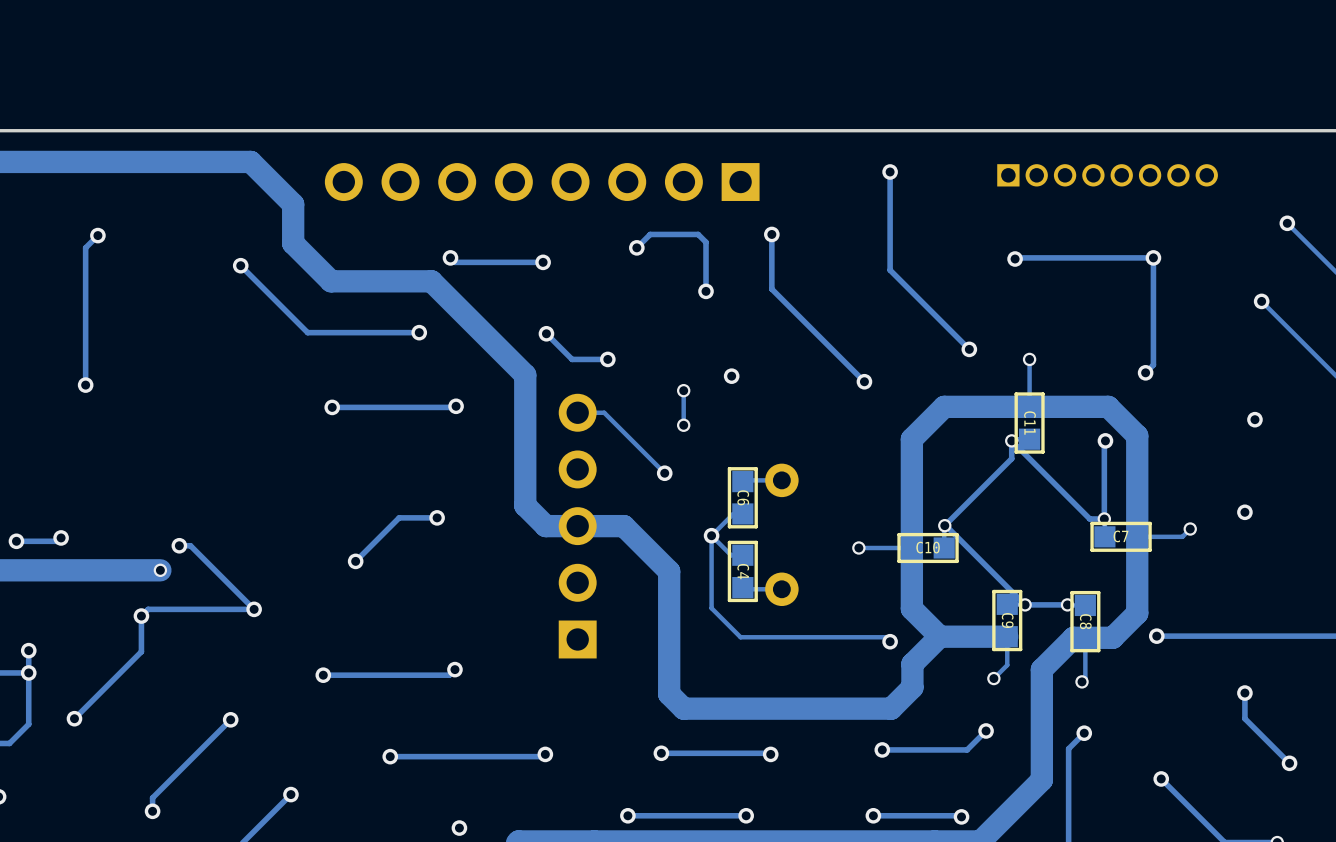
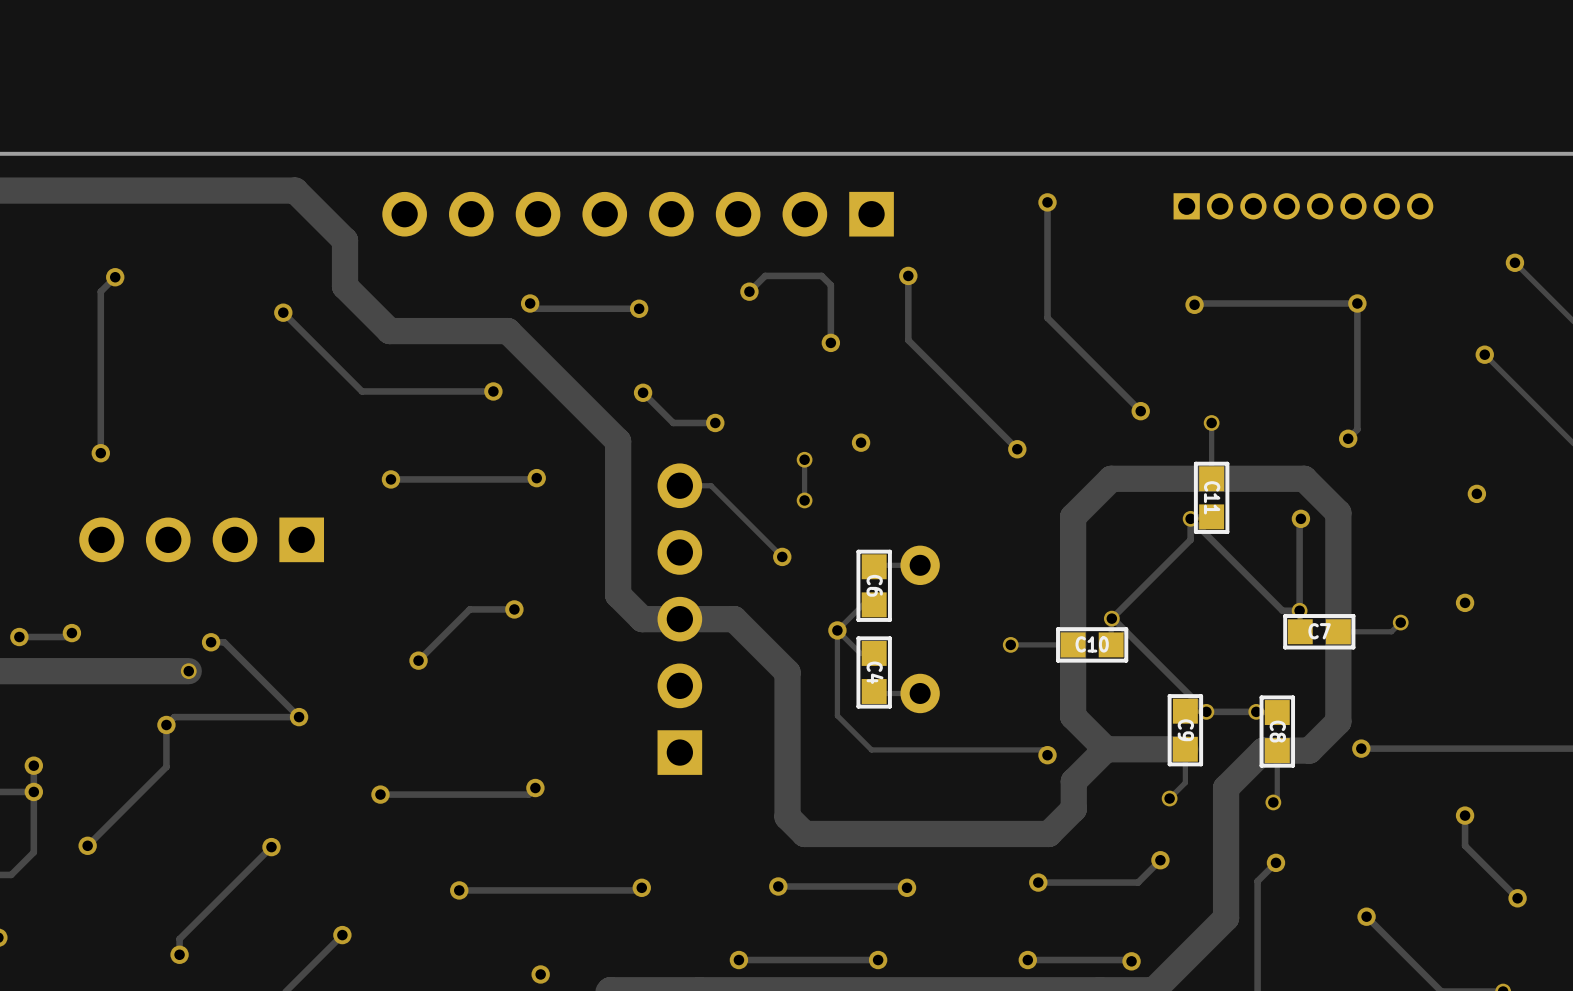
part: none -> (201, 539)

